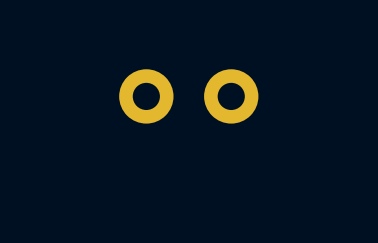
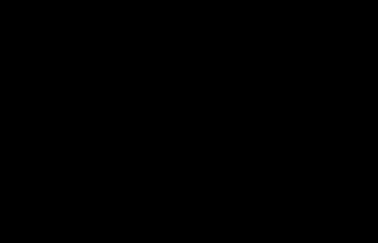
part: (188, 96) -> none

